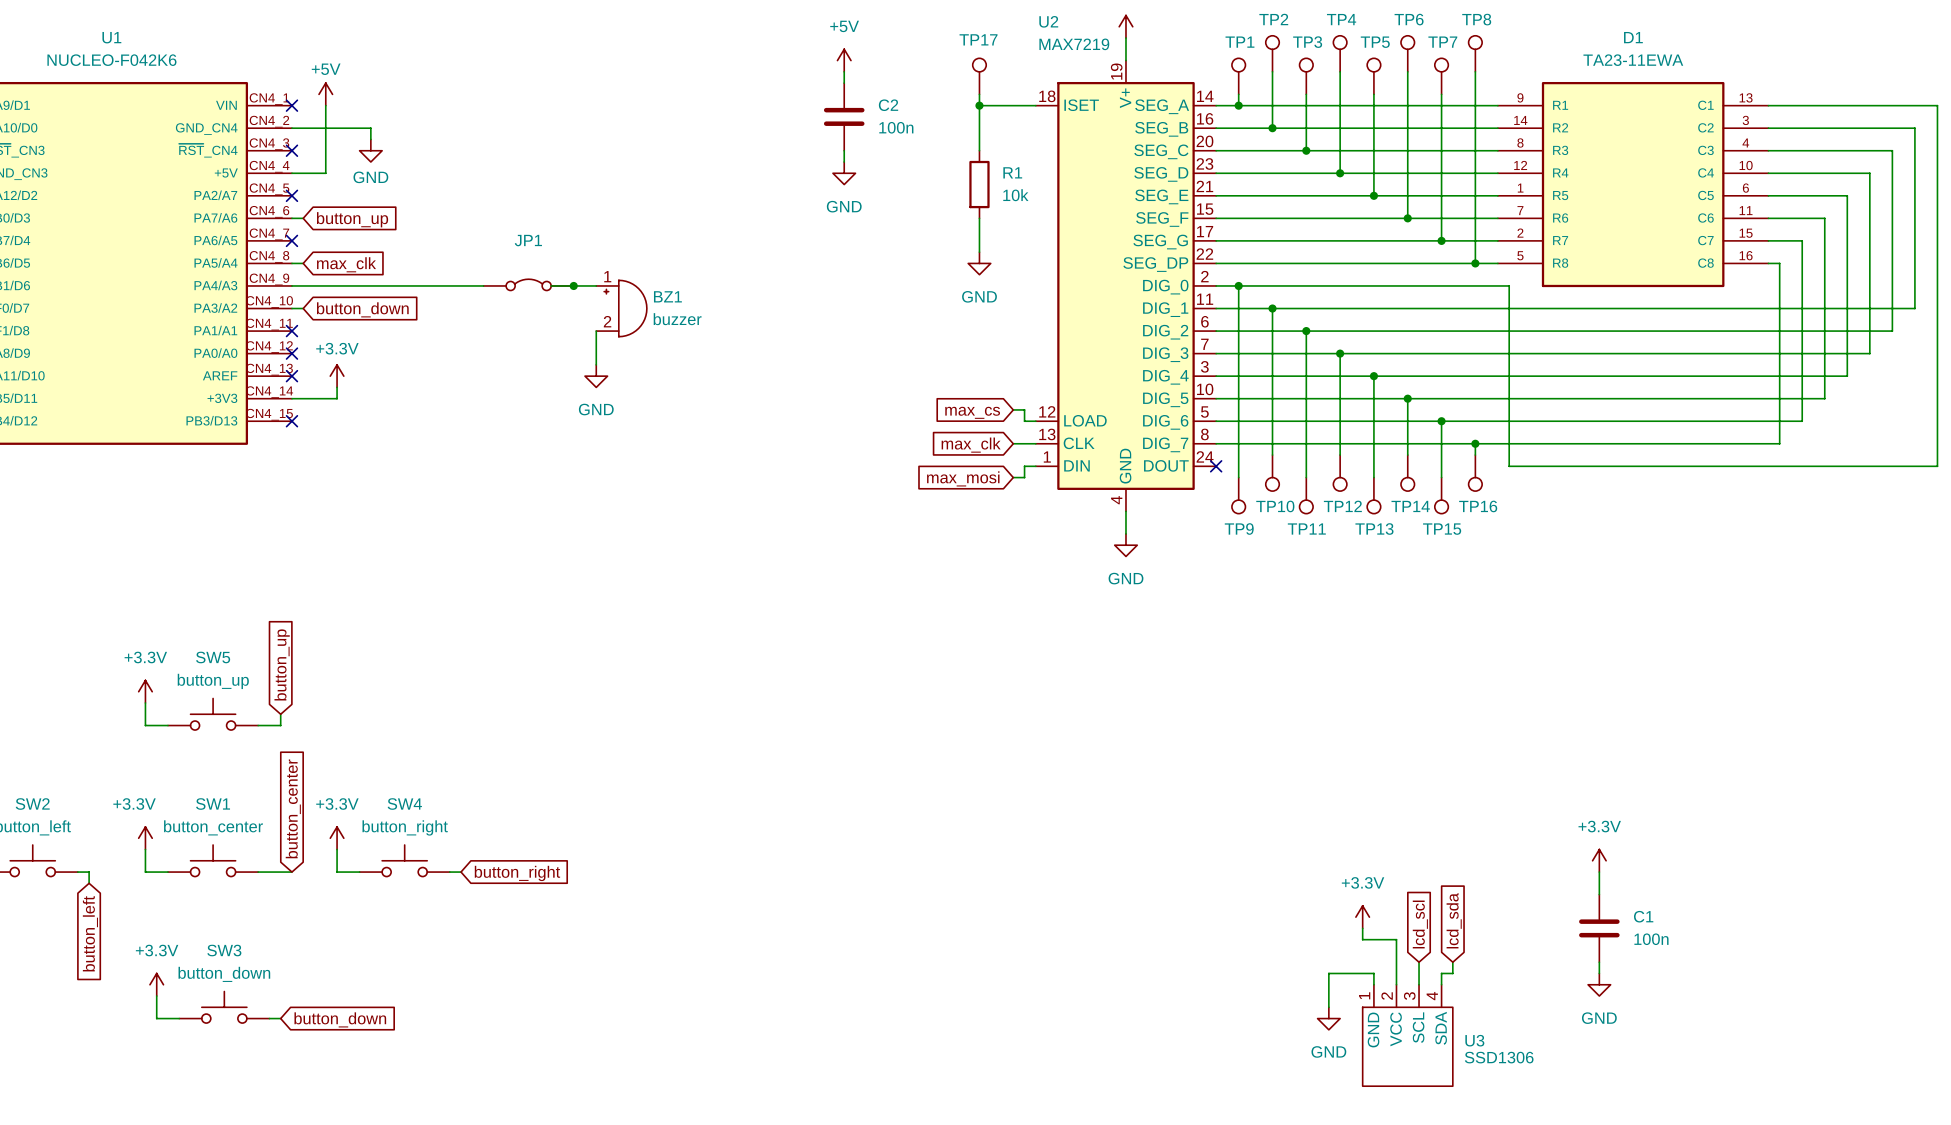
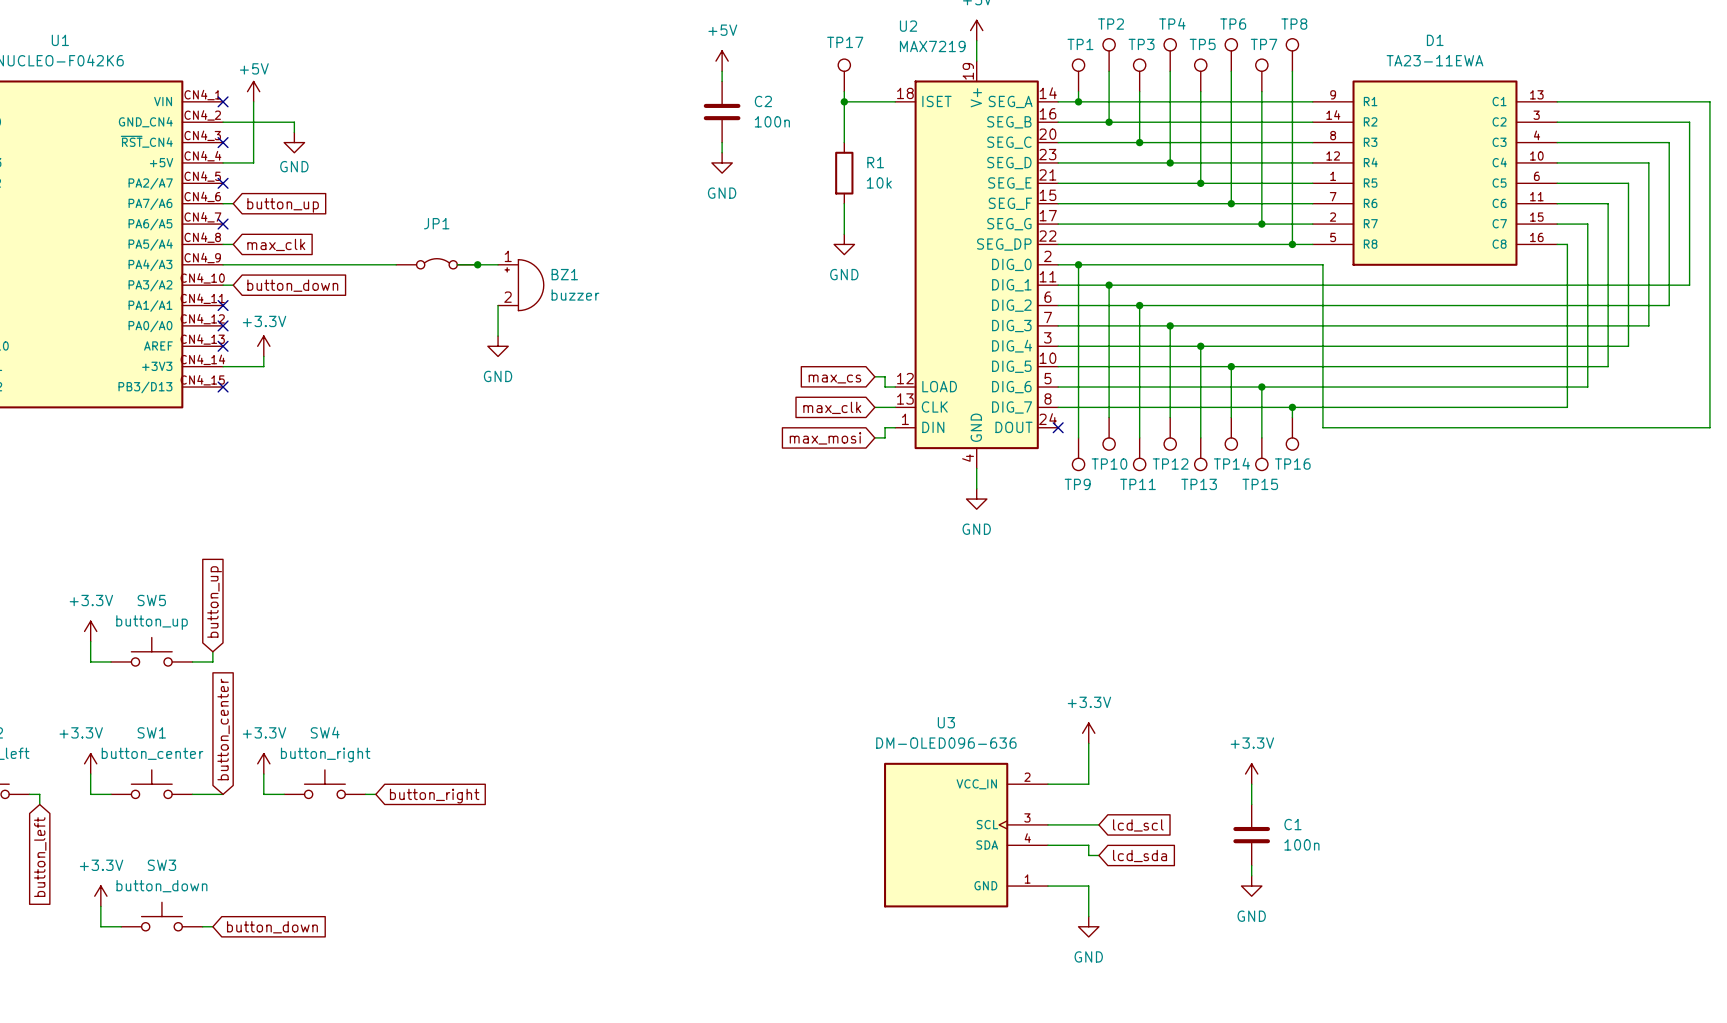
power symbol: none -> +3.3V (1088, 733)
wire: none -> (1088, 743) (1088, 784) (1047, 784)
power symbol: none -> +3.3V (1251, 774)
power symbol: +3.3V (1599, 860) -> none
wire: (1599, 872) (1599, 894) -> (1251, 784) (1251, 804)
wire: none -> (1047, 824) (1098, 824)
power symbol: +3.3V (1362, 917) -> none
global label rotation: 0° (1454, 920) -> 90° clockwise (1140, 855)
global label position: lcd_sda (1454, 920) -> lcd_sda (1140, 855)
global label rotation: 0° (1420, 924) -> 90° clockwise (1138, 825)
global label position: lcd_scl (1420, 924) -> lcd_scl (1138, 825)
wire: none -> (1047, 845) (1088, 845) (1088, 855) (1098, 855)
wire: (1362, 928) (1362, 939) (1396, 939) (1396, 984) -> none
C1 position: (1599, 928) -> (1251, 835)
wire: (1419, 962) (1419, 984) -> none
wire: (1452, 962) (1452, 973) (1441, 973) (1441, 984) -> none
wire: (1599, 962) (1599, 973) -> (1251, 865) (1251, 875)
wire: none -> (1047, 886) (1088, 886) (1088, 916)
power symbol: none -> GND (1251, 886)
U3 symbol: [1362, 984, 1453, 1087] -> [884, 762, 1048, 908]
wire: (1373, 984) (1373, 973) (1328, 973) (1328, 1007) -> none
power symbol: GND (1599, 984) -> none
power symbol: none -> GND (1088, 926)
power symbol: GND (1328, 1018) -> none
U3 name position: U3 (1474, 1040) -> U3 (946, 722)
U3 value: SSD1306 (1499, 1057) -> DM-OLED096-636 (946, 743)

